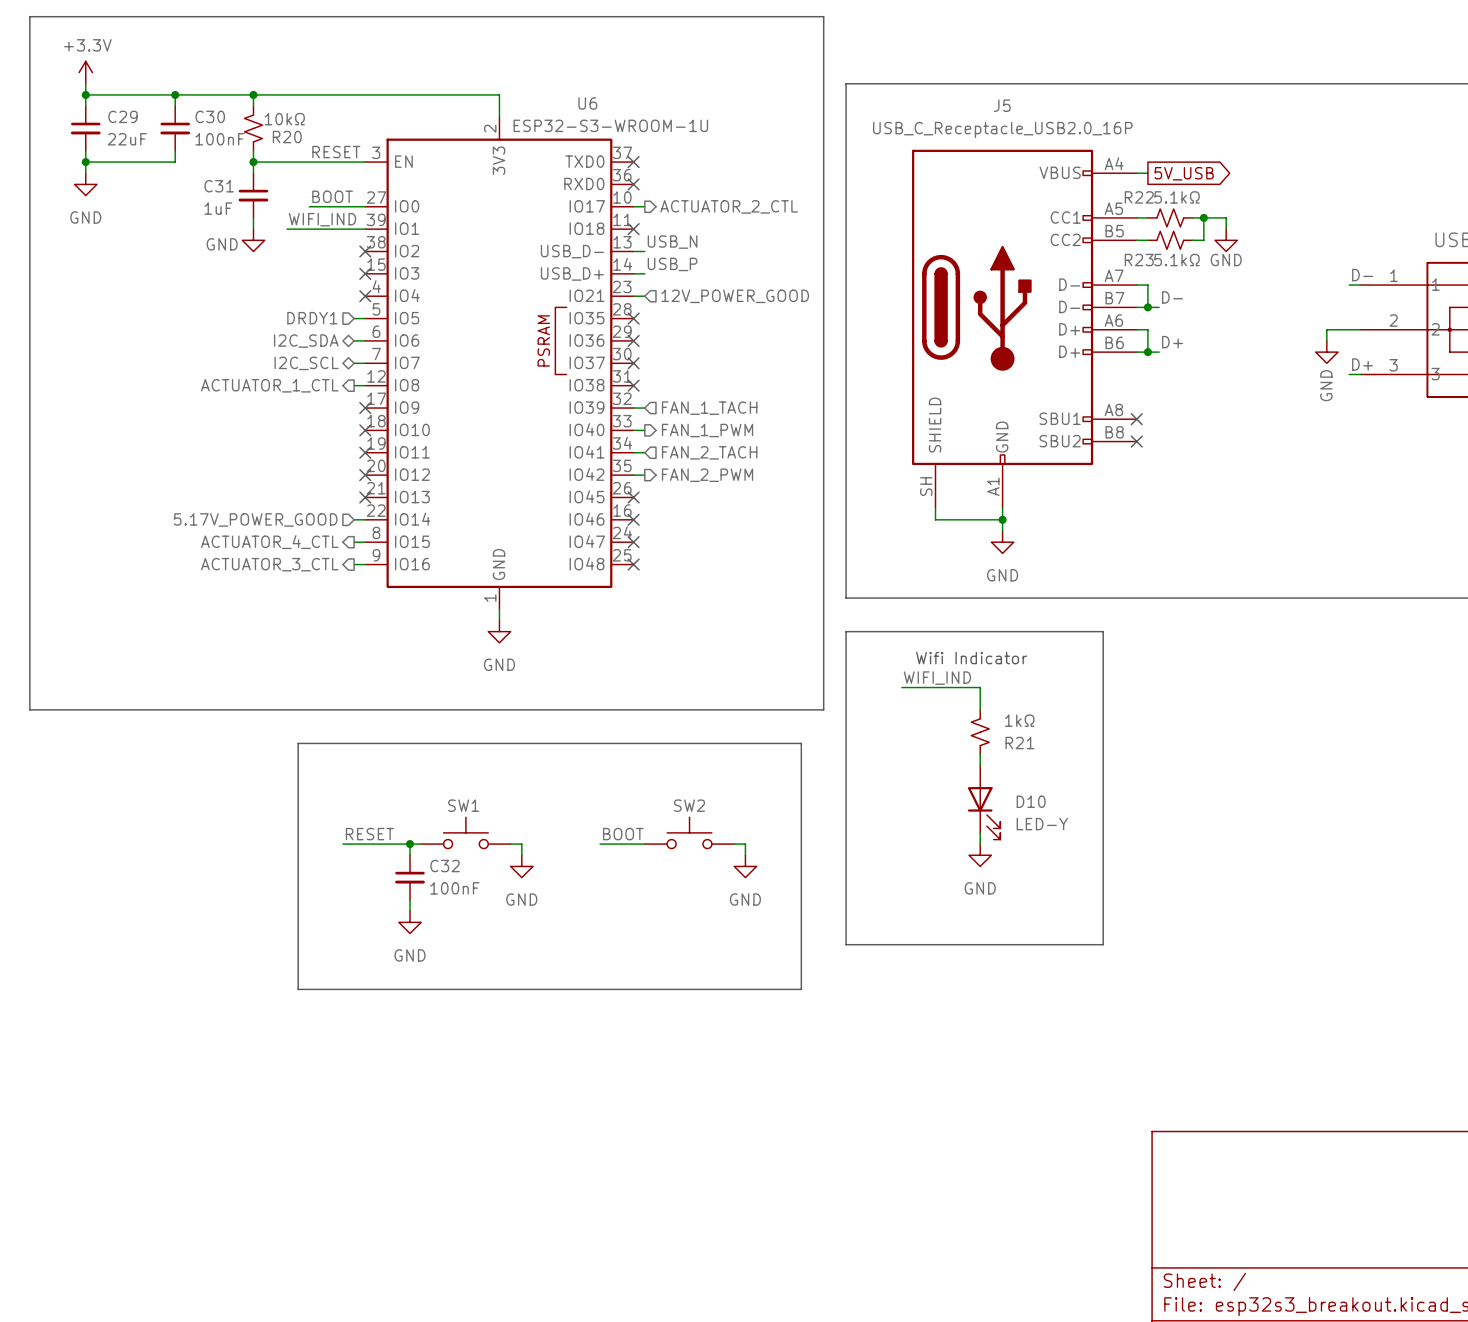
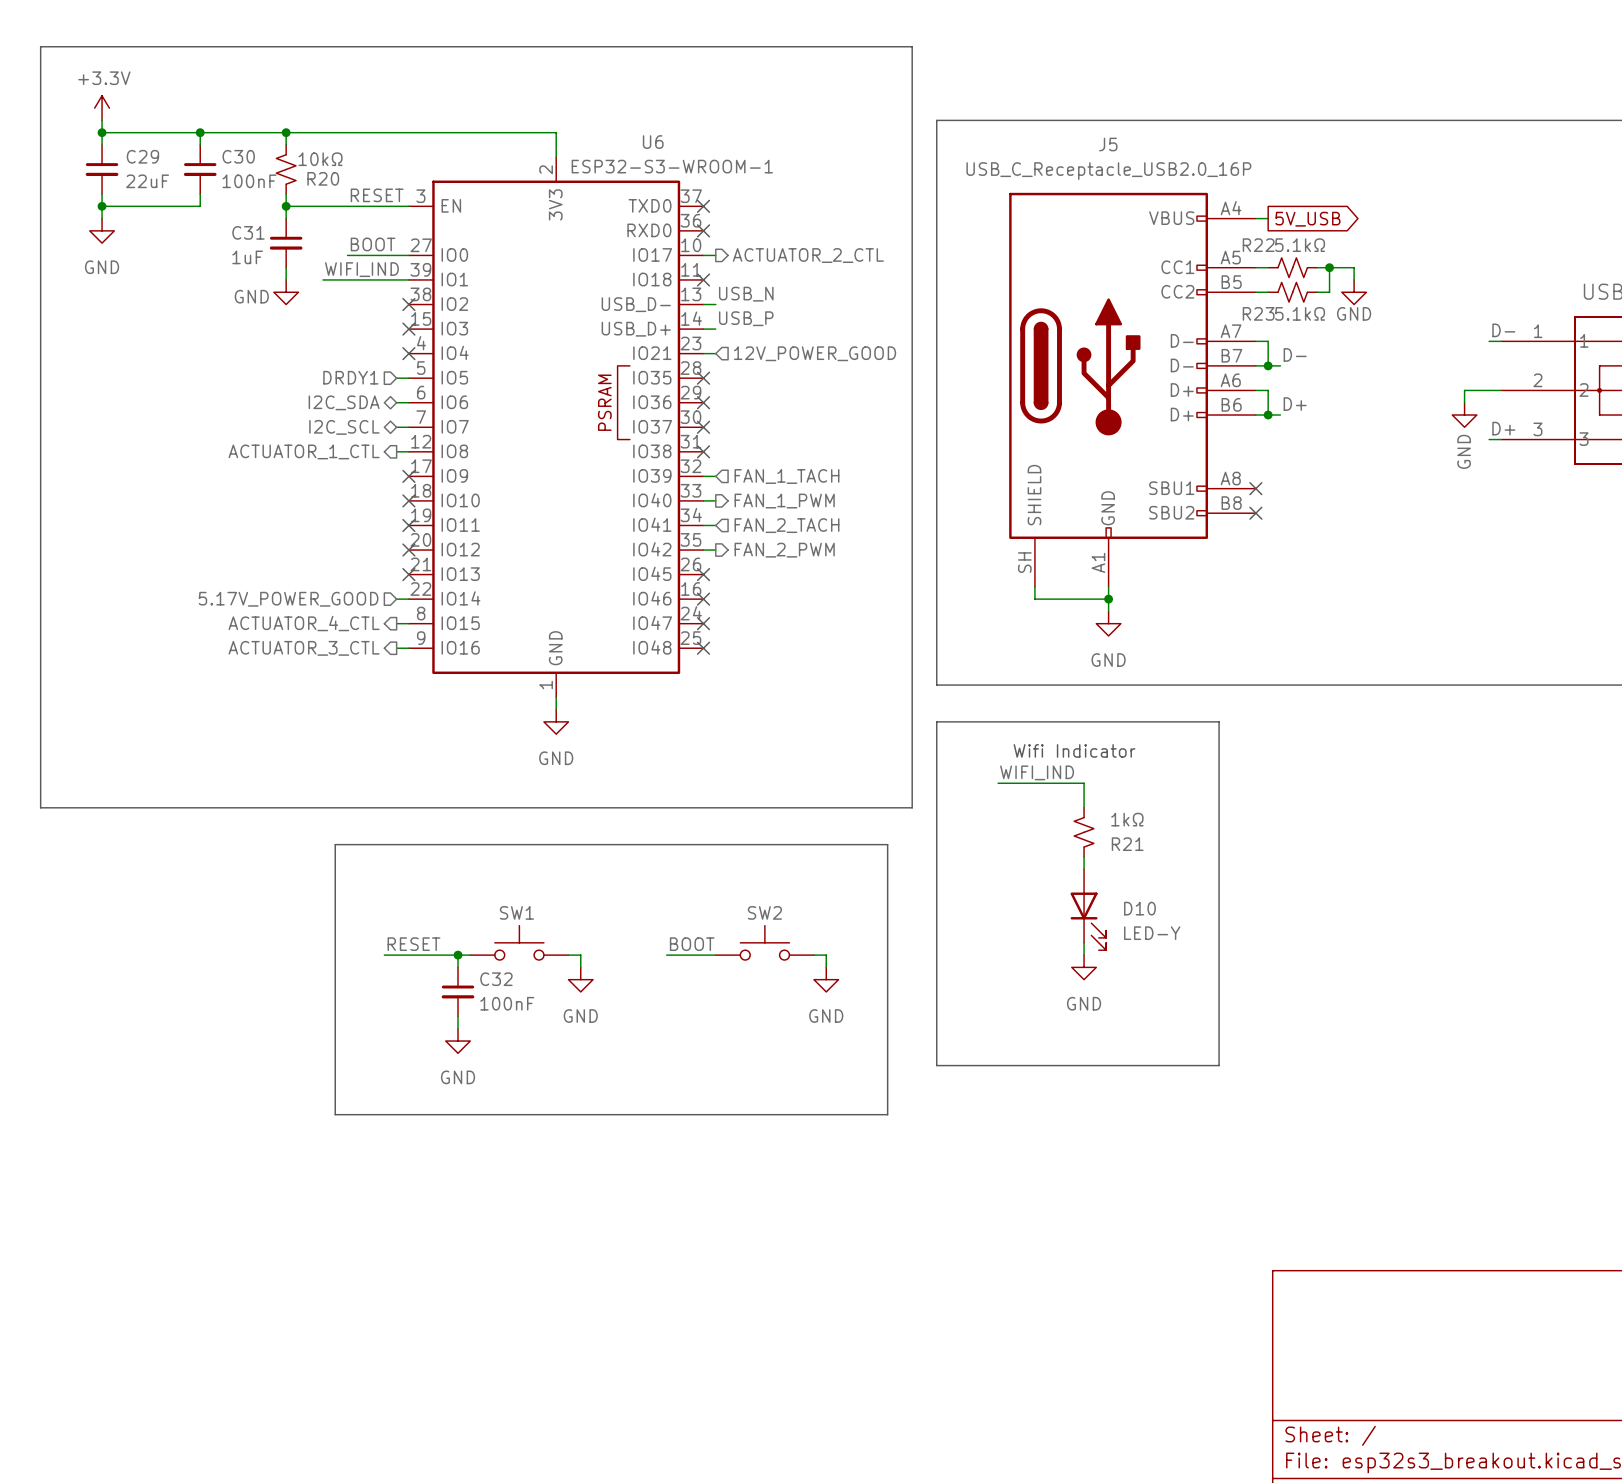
U6 value: ESP32-S3-WROOM-1U (610, 125) -> ESP32-S3-WROOM-1 (672, 166)

